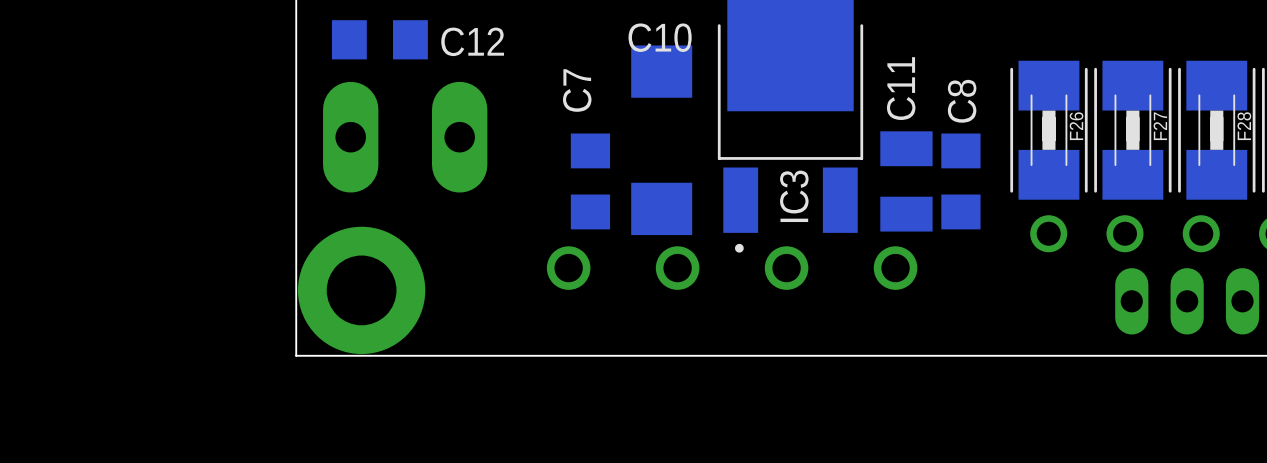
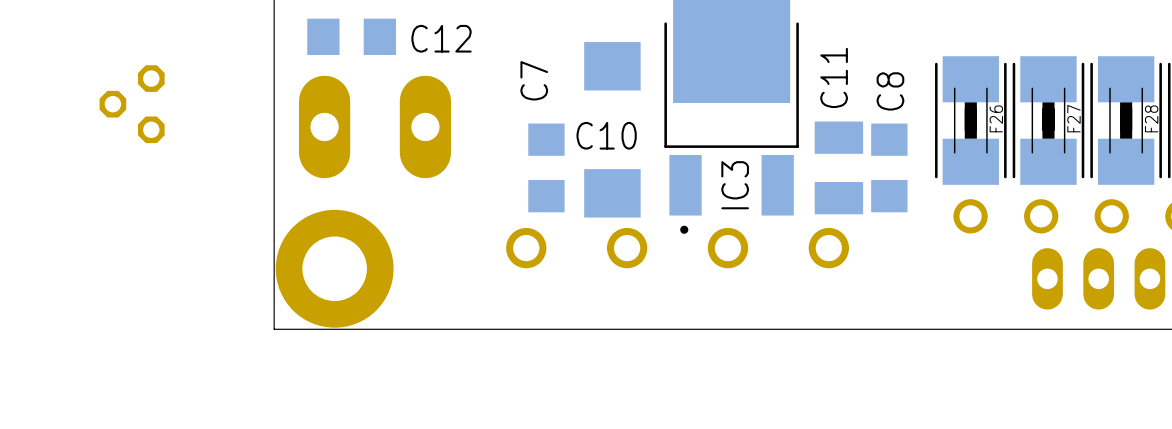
C10 name position: C10 (660, 37) -> C10 (606, 135)
part: none -> (132, 104)

